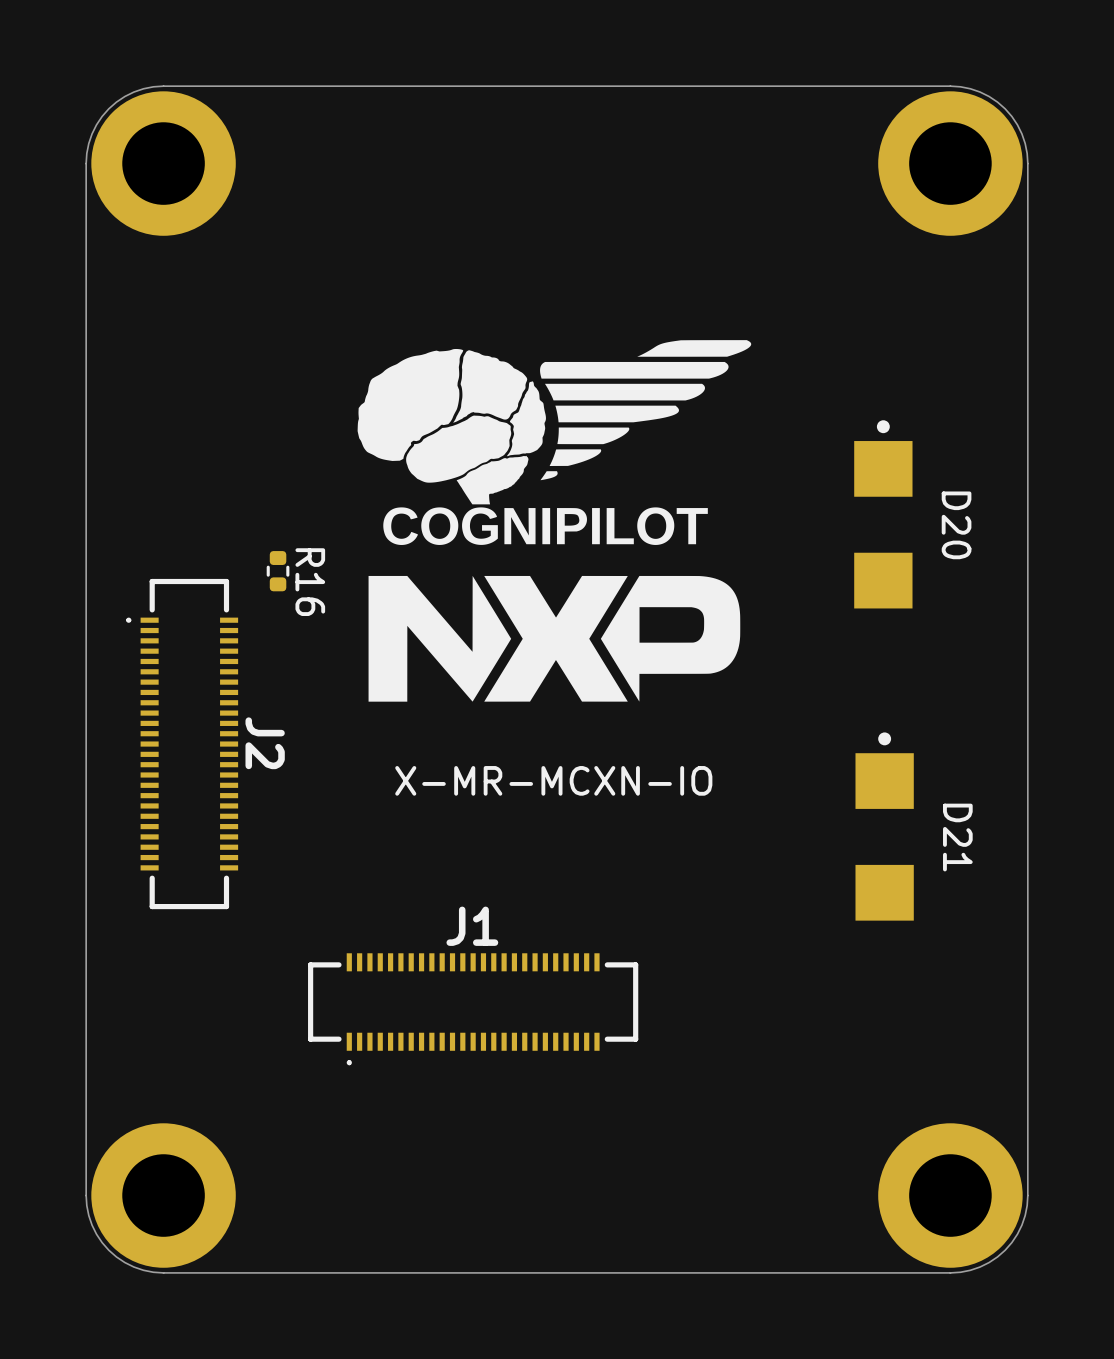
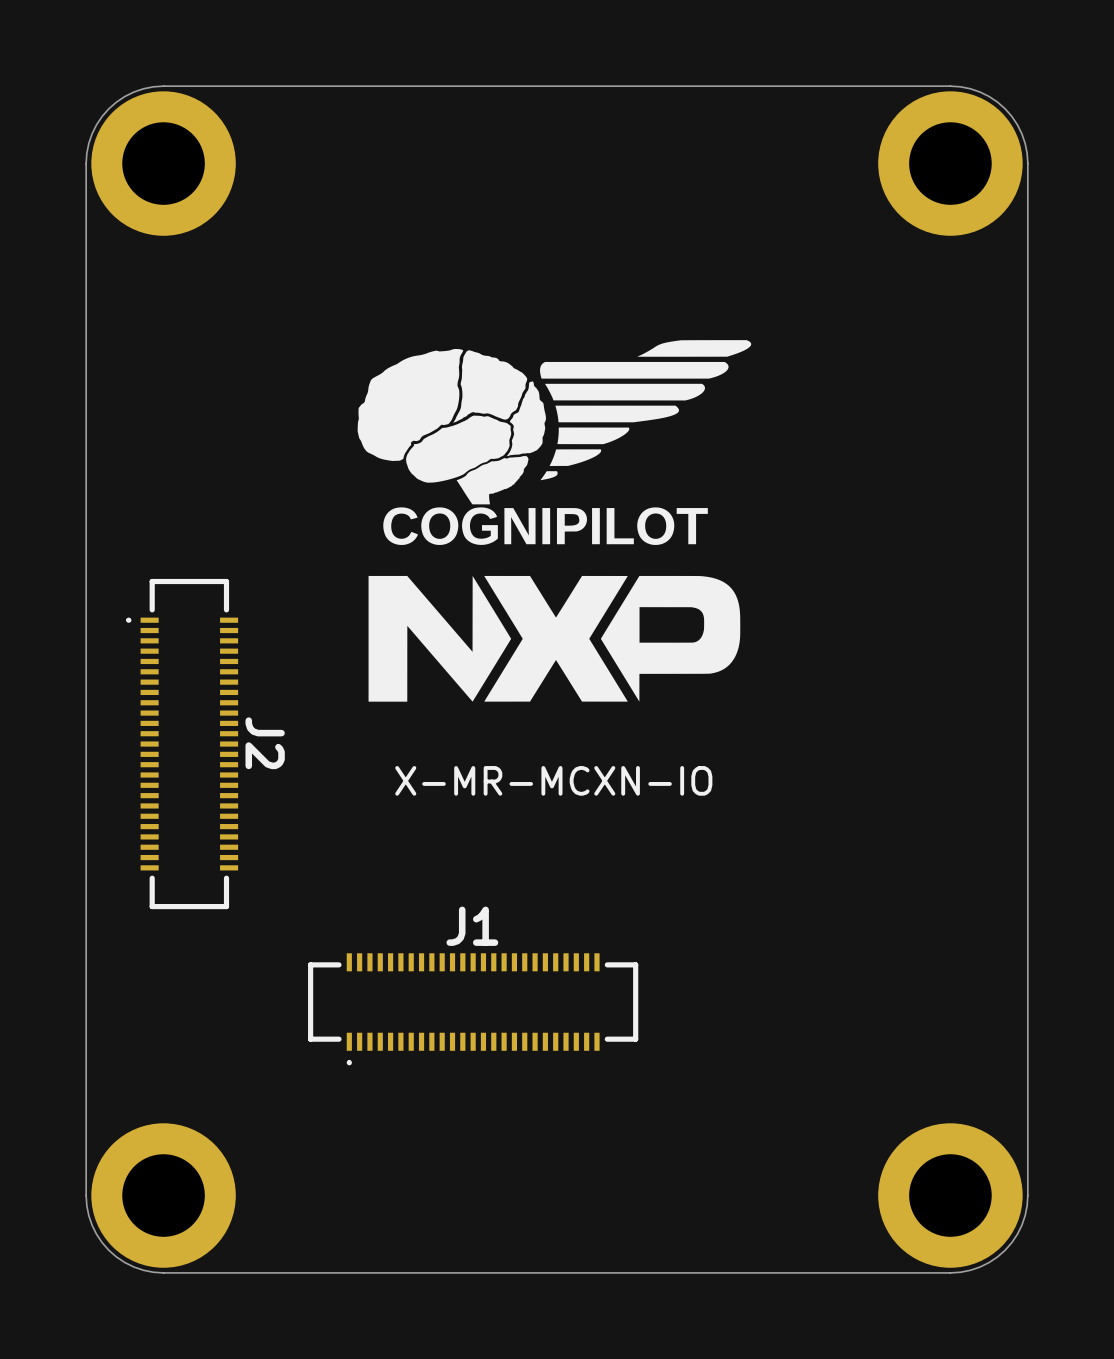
D20: (883, 514) -> none
R16: (278, 571) -> none
D21: (884, 826) -> none

